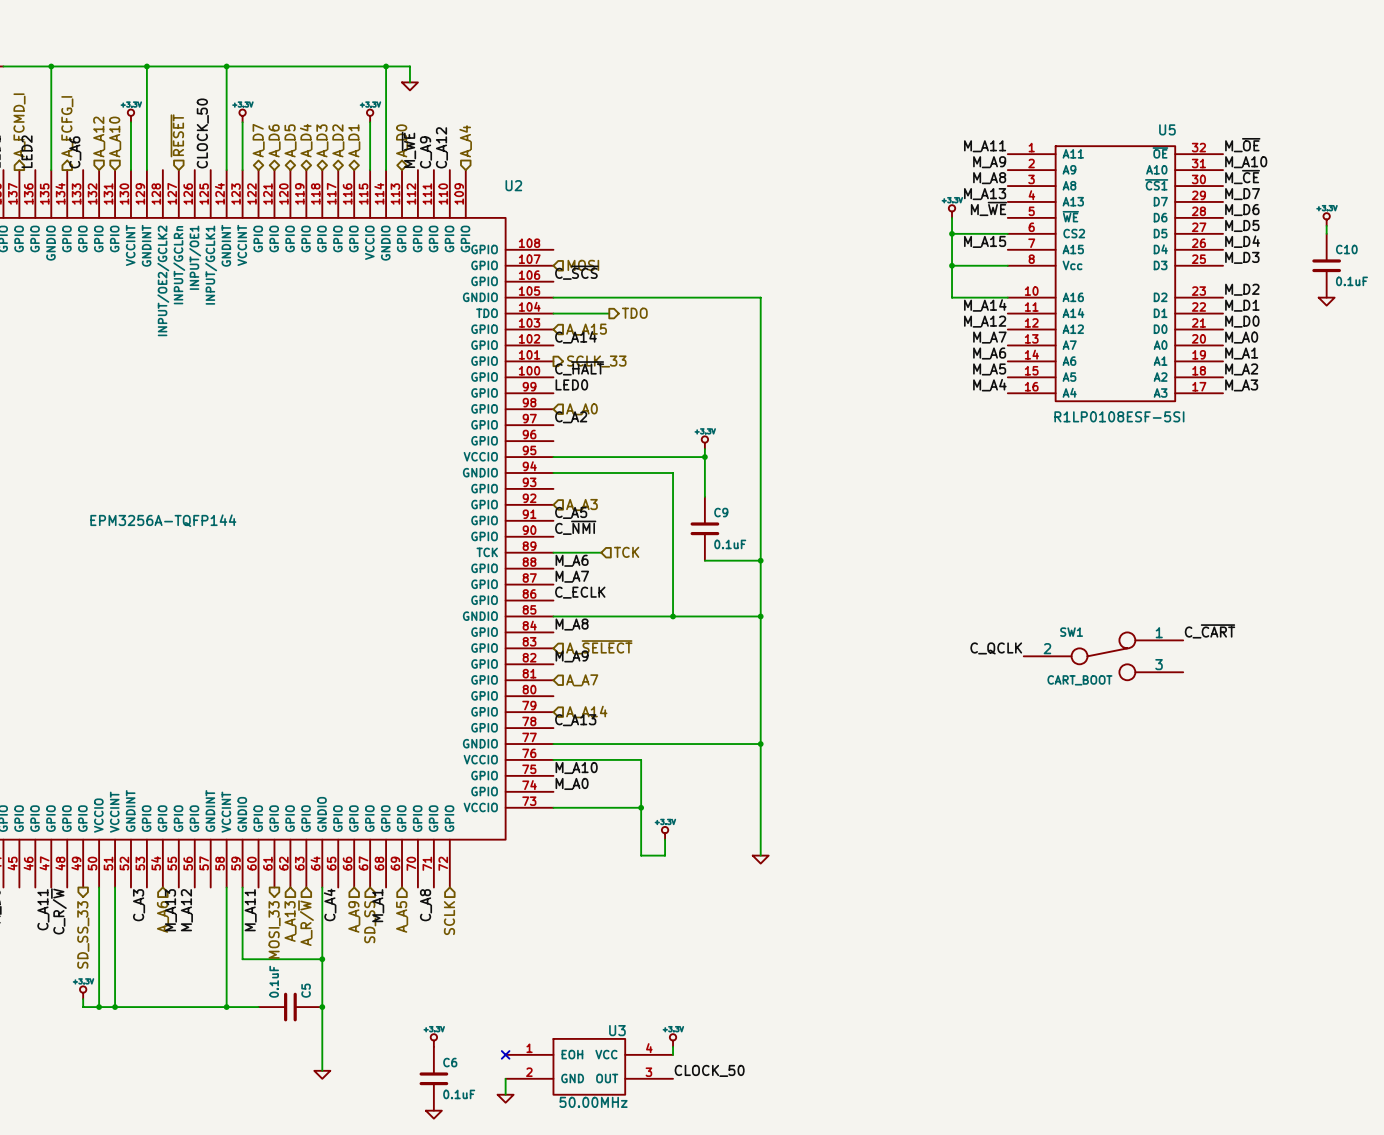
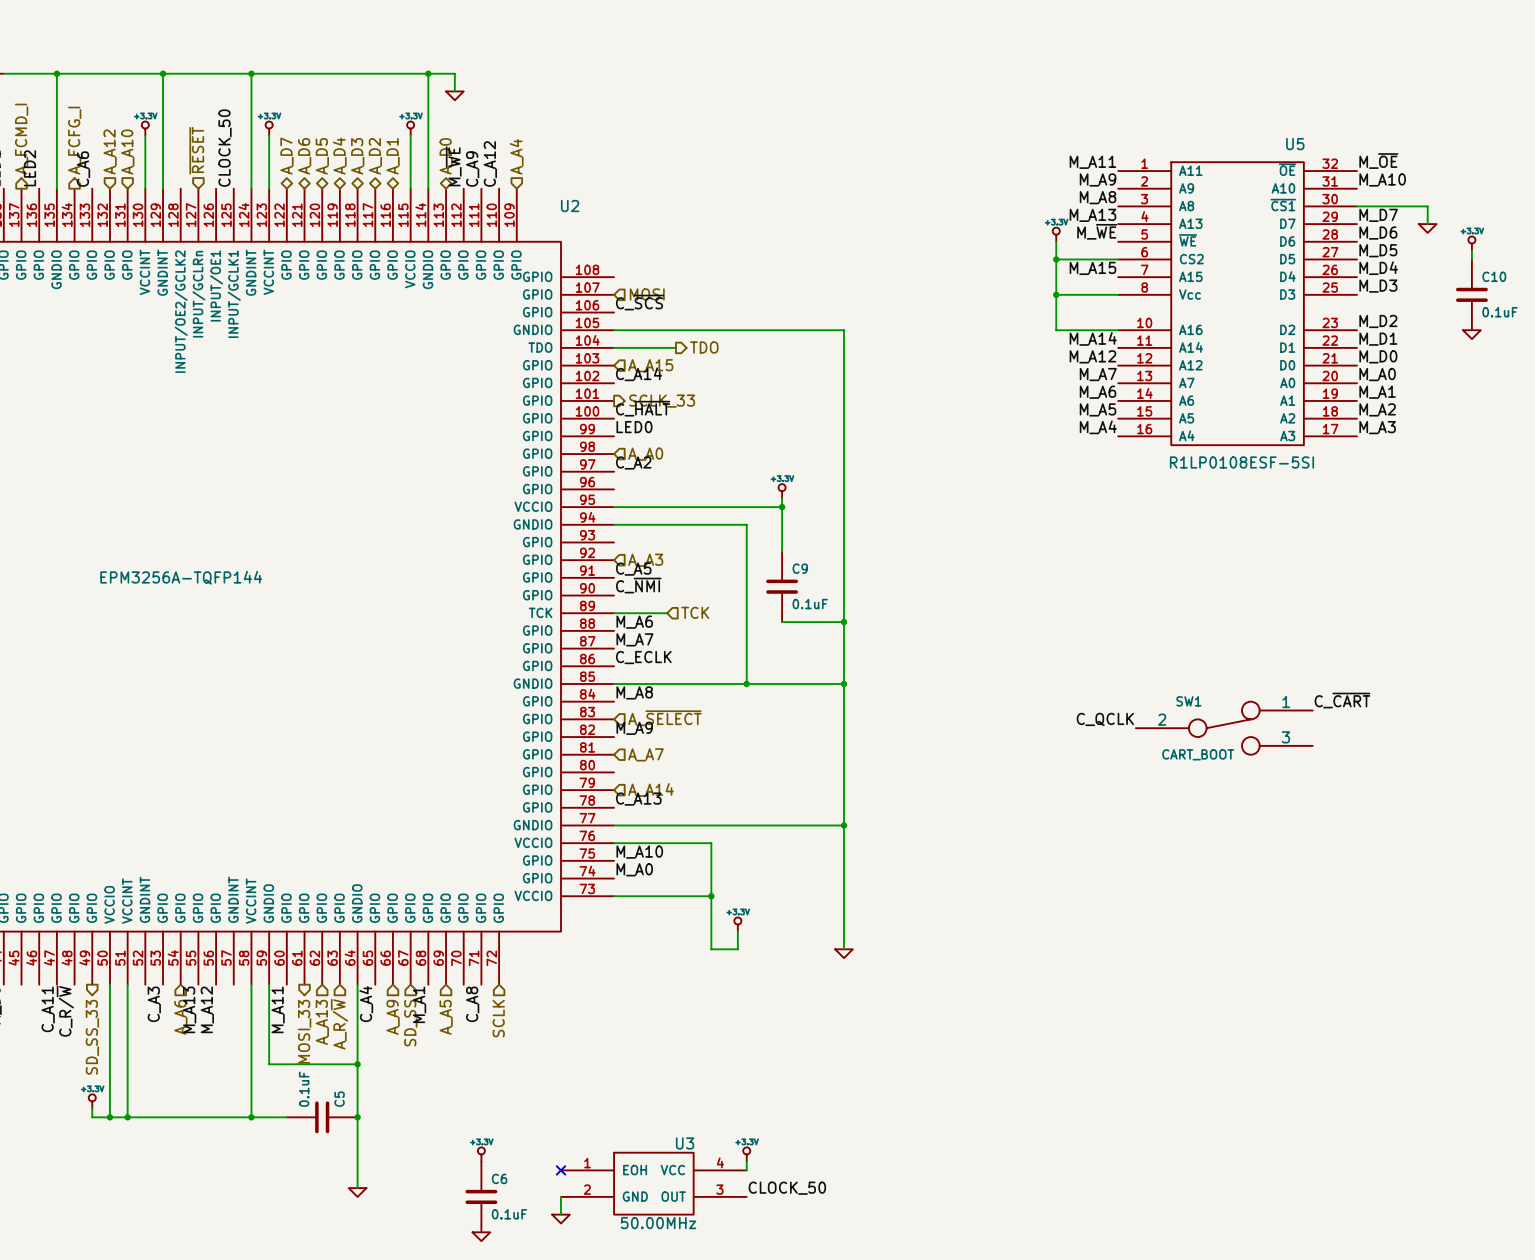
label: M_~{CE} (1242, 177) -> none
wire: none -> (1356, 206) (1427, 206) (1427, 224)
power symbol: none -> (1427, 228)

